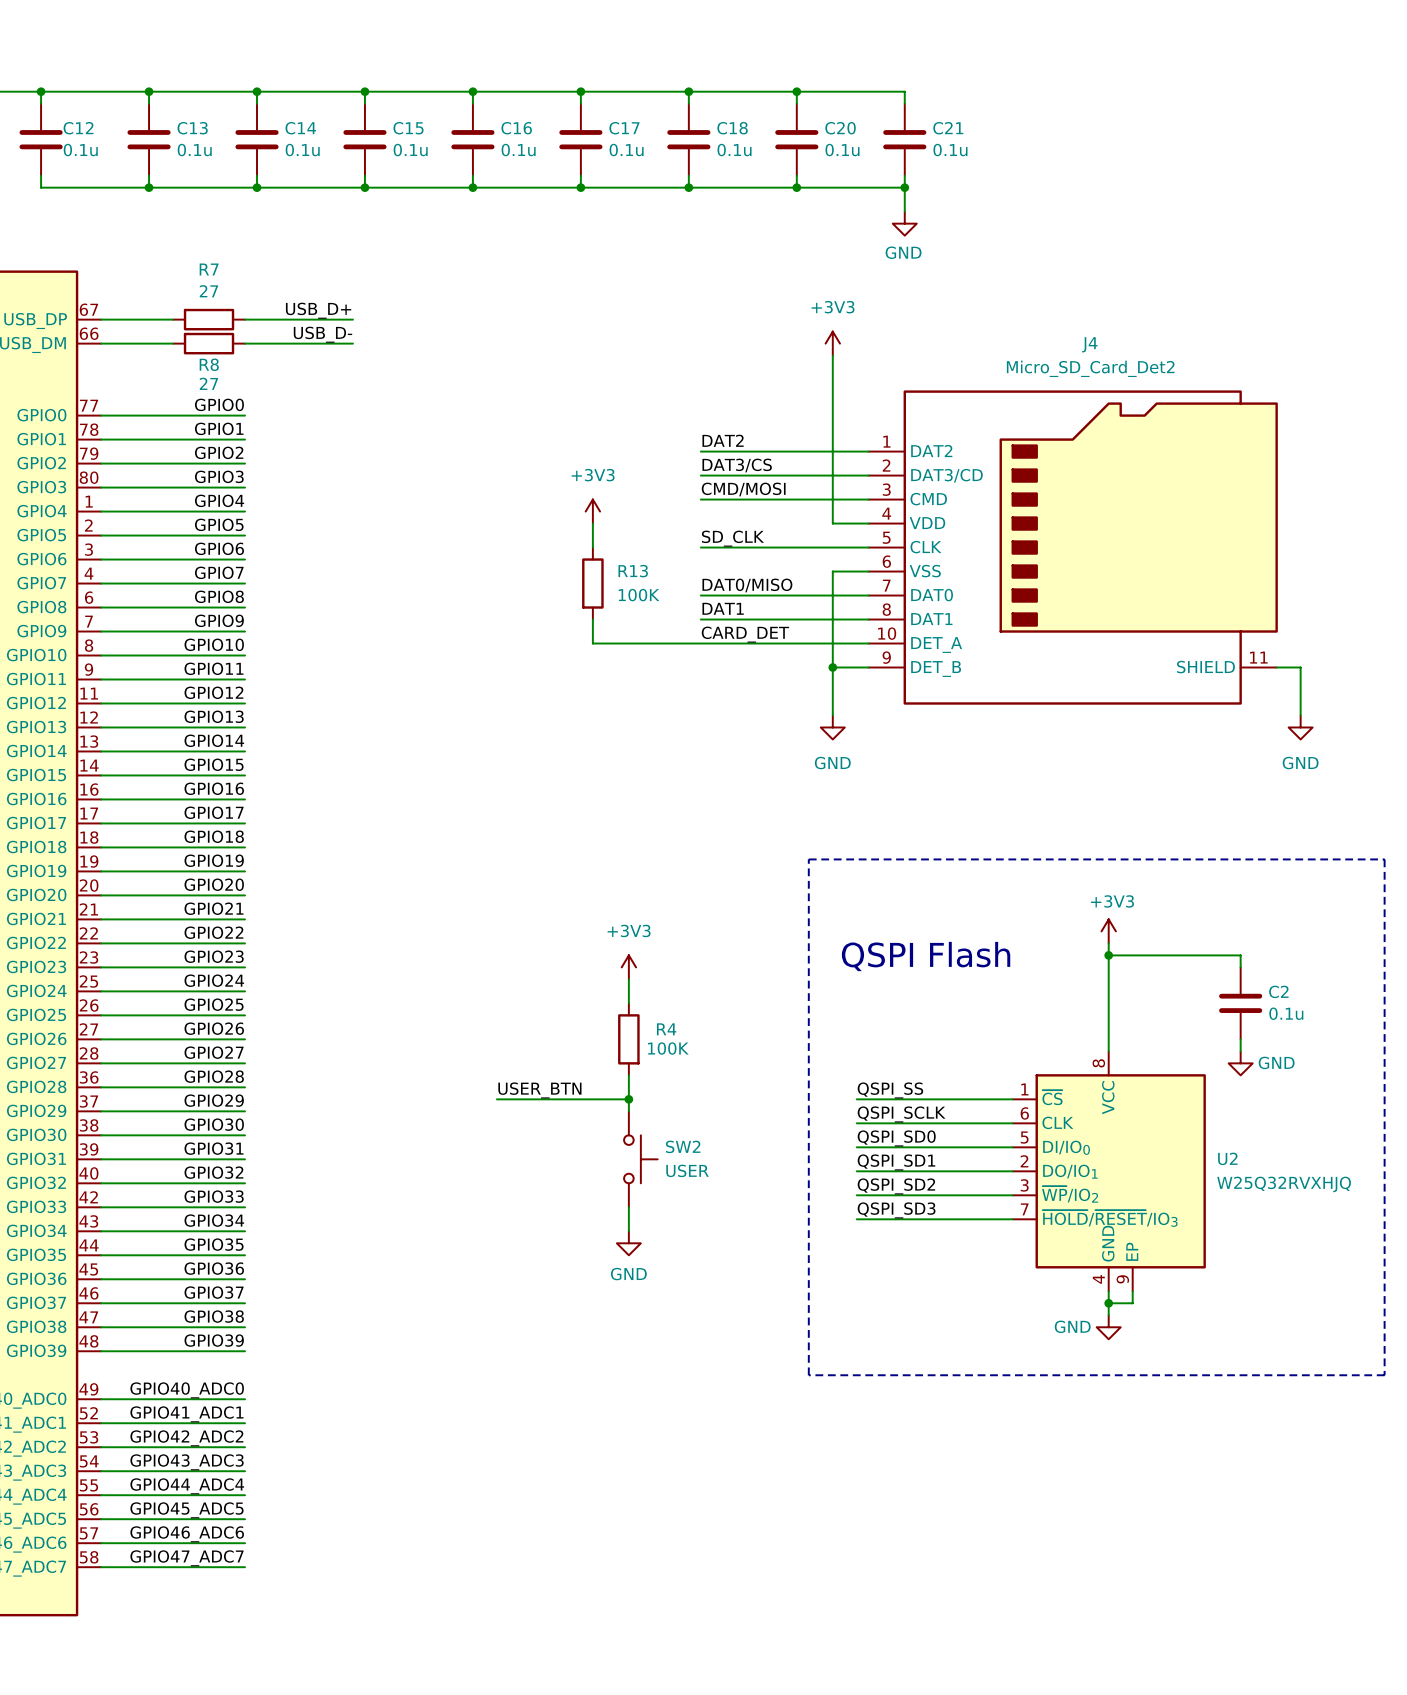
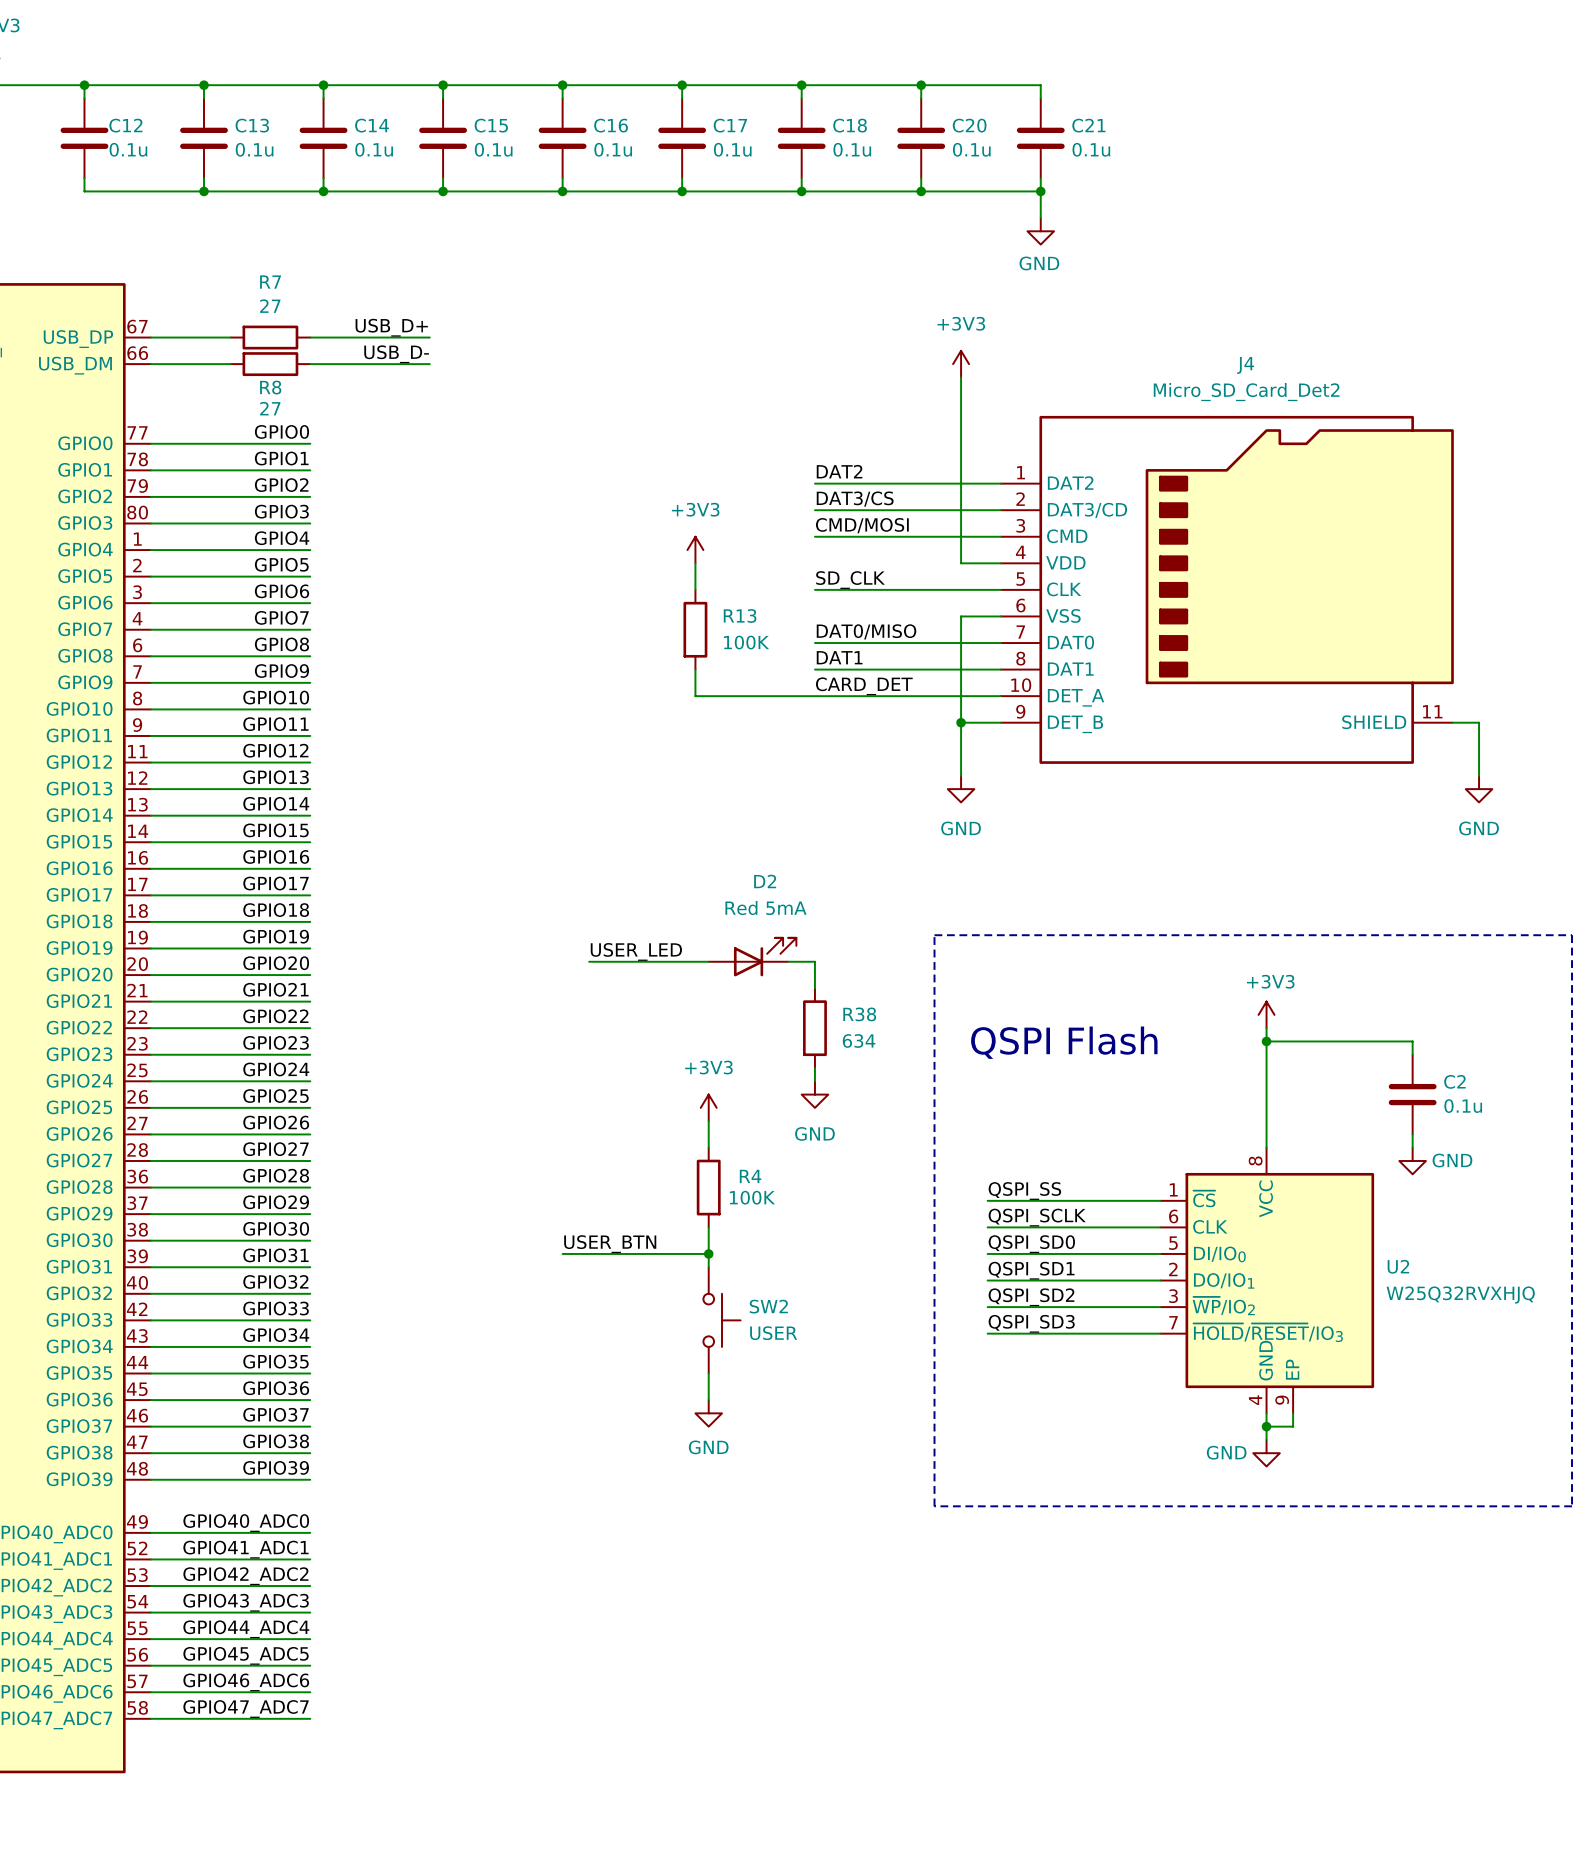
label: none -> USER_LED (636, 951)
D2: none -> Red 5mA (752, 957)
wire: none -> (589, 961) (708, 961)
wire: none -> (788, 961) (814, 961) (814, 988)
R38: none -> 634 (814, 1028)
power symbol position: +3V3 (628, 967) -> +3V3 (708, 1107)
wire: (628, 979) (628, 1003) -> (708, 1121) (708, 1147)
wire: none -> (814, 1068) (814, 1081)
power symbol: none -> GND (814, 1094)
R4 position: (628, 1039) -> (708, 1187)
wire: (628, 1075) (628, 1111) -> (708, 1227) (708, 1267)
label position: USER_BTN (539, 1090) -> USER_BTN (610, 1244)
wire: (496, 1099) (628, 1099) -> (562, 1253) (708, 1253)
junction position: (628, 1099) -> (708, 1253)
SW2 position: (640, 1159) -> (722, 1320)
wire: (628, 1207) (628, 1231) -> (708, 1373) (708, 1400)
power symbol position: GND (628, 1243) -> GND (708, 1413)

